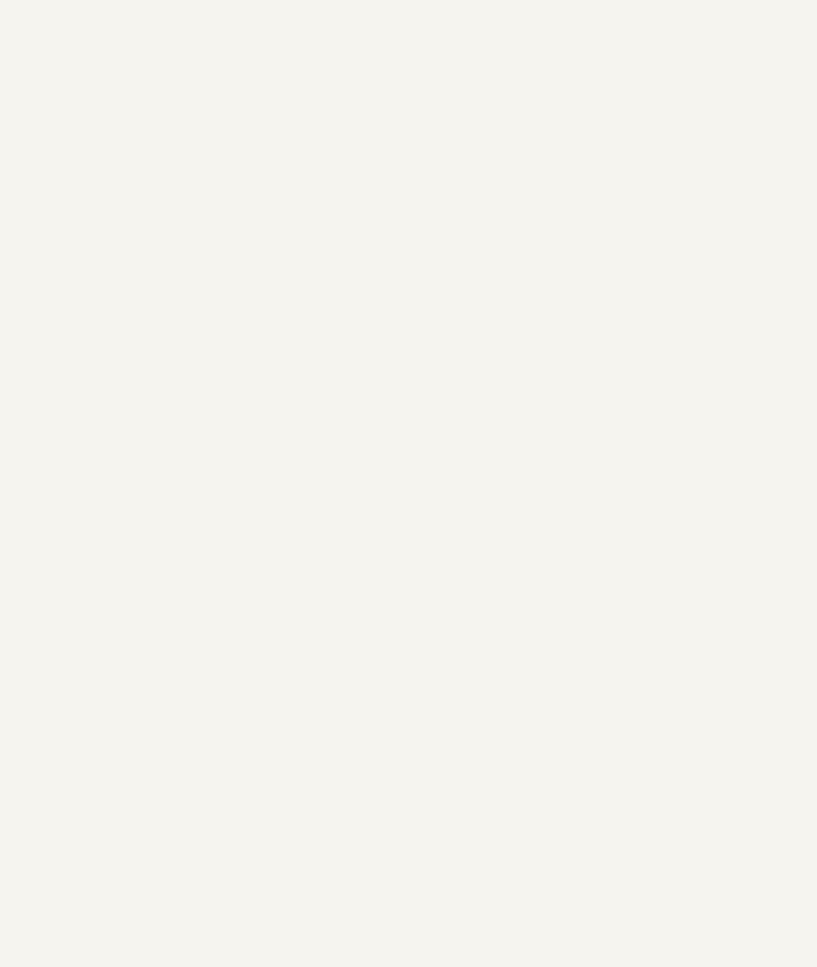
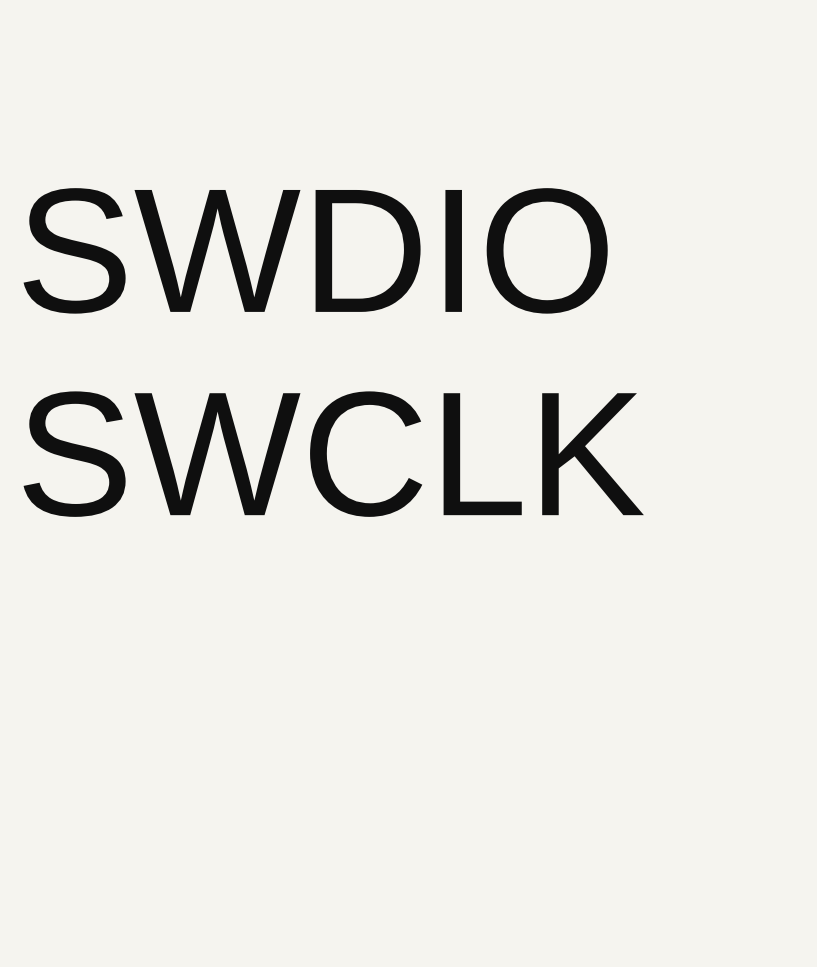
label: none -> SWDIO (315, 250)
label: none -> SWCLK (333, 454)

